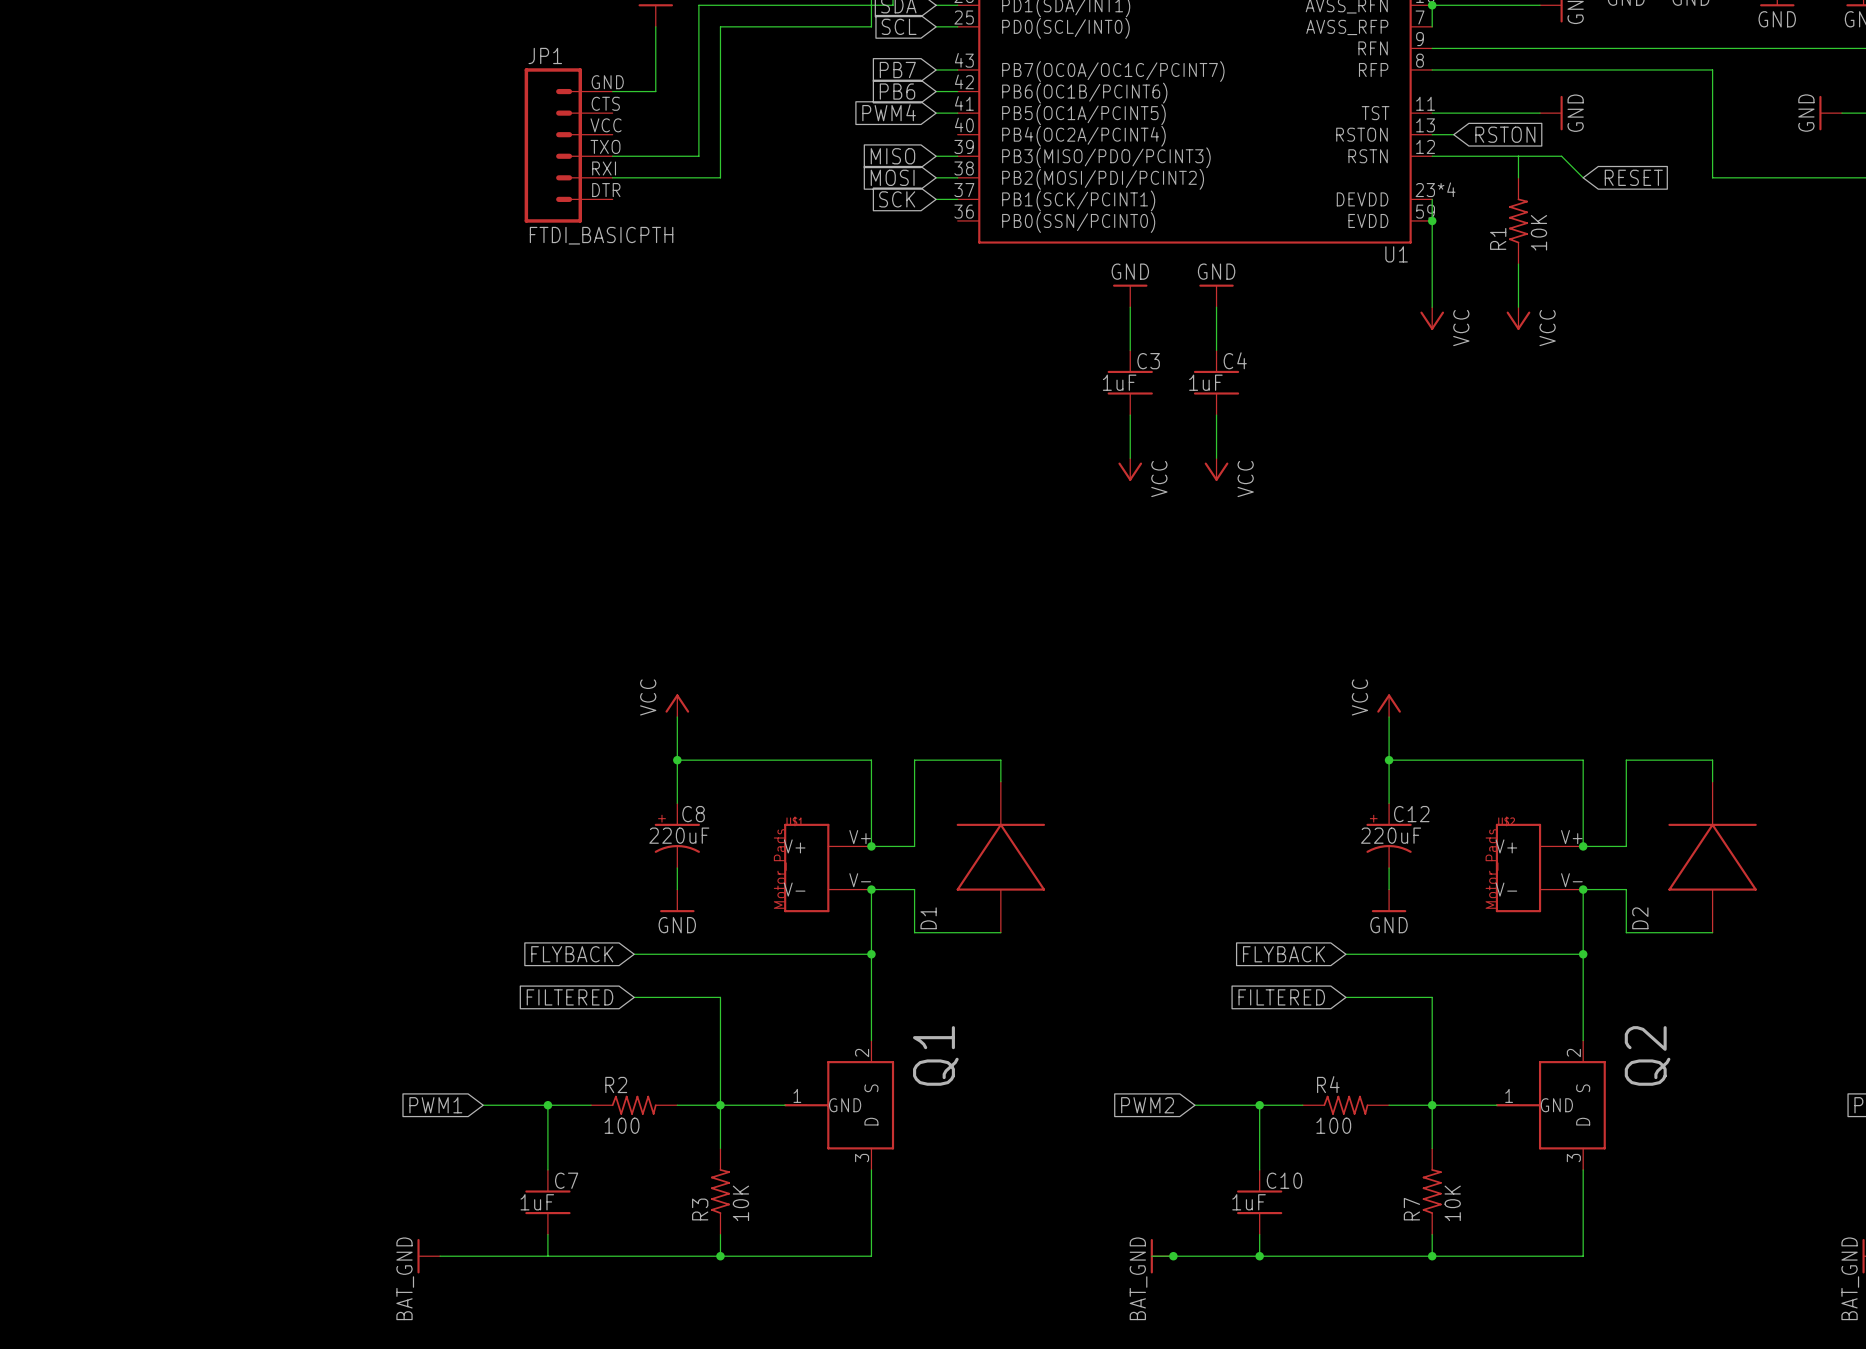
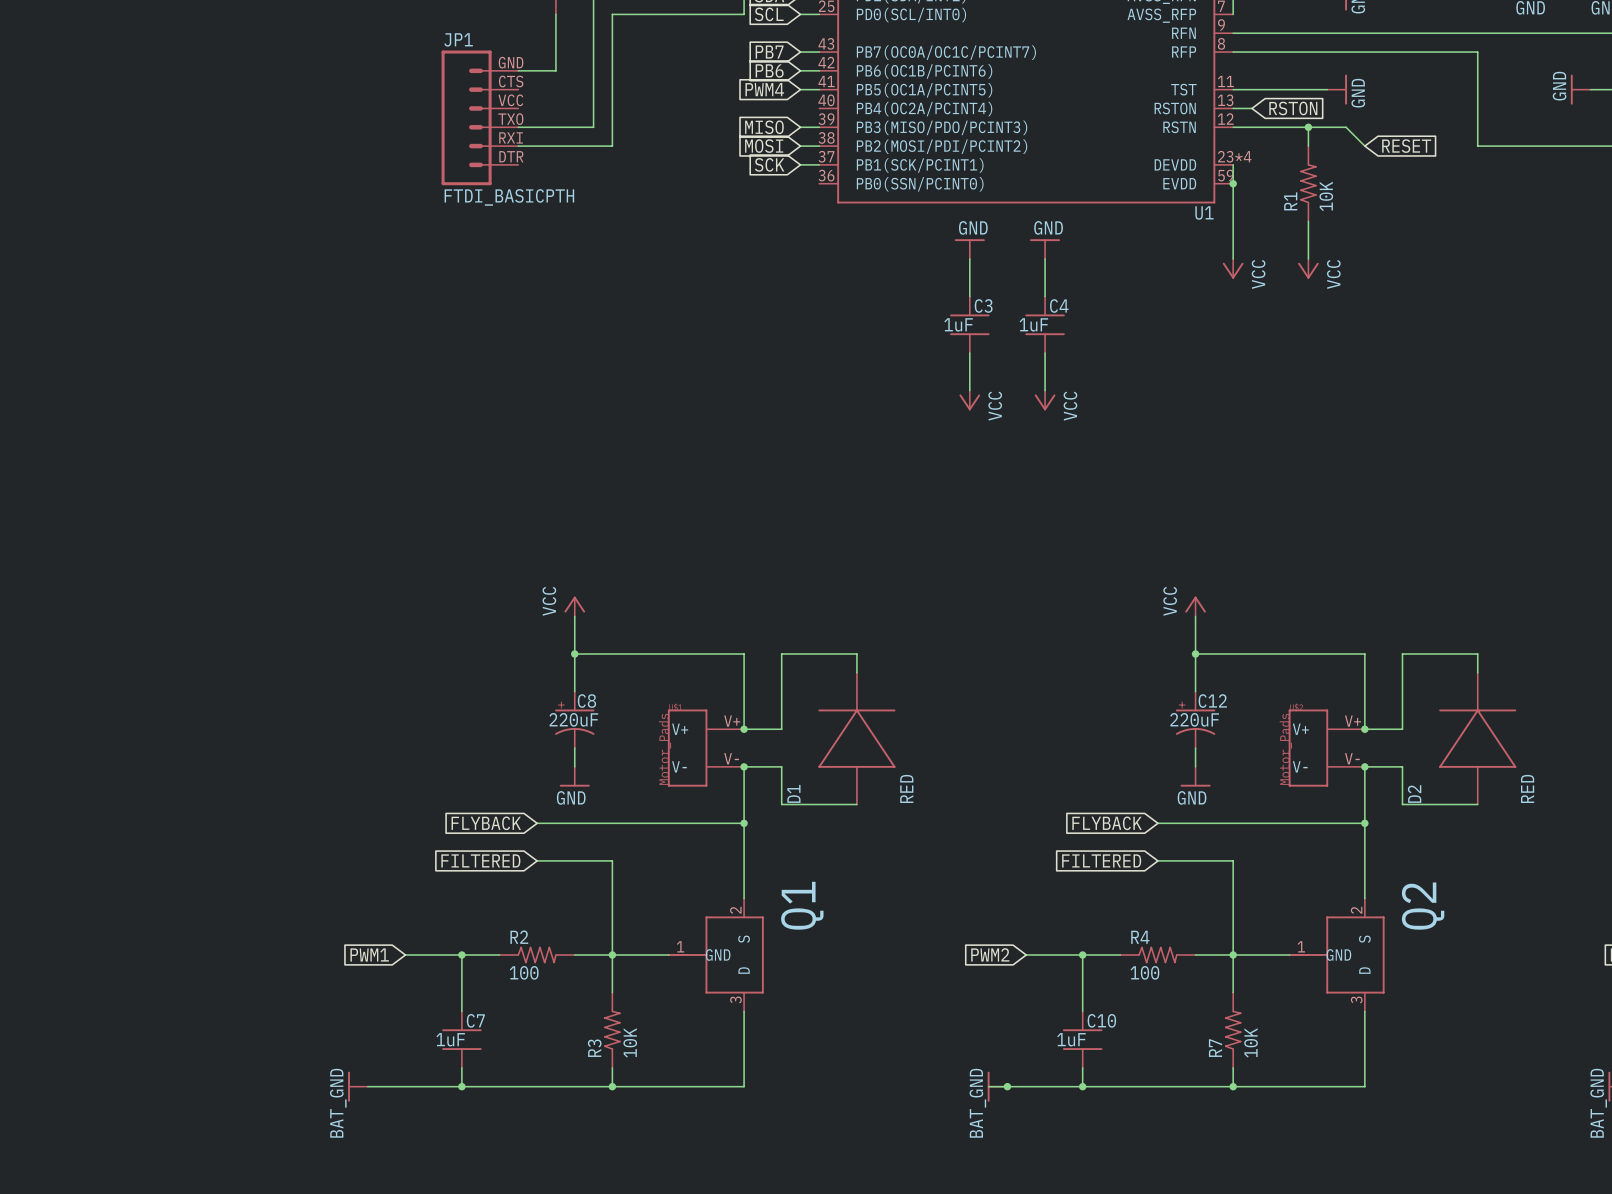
junction: none -> (1308, 127)
D1 value: none -> RED (906, 788)
D2 value: none -> RED (1527, 788)
junction: none -> (461, 1086)

